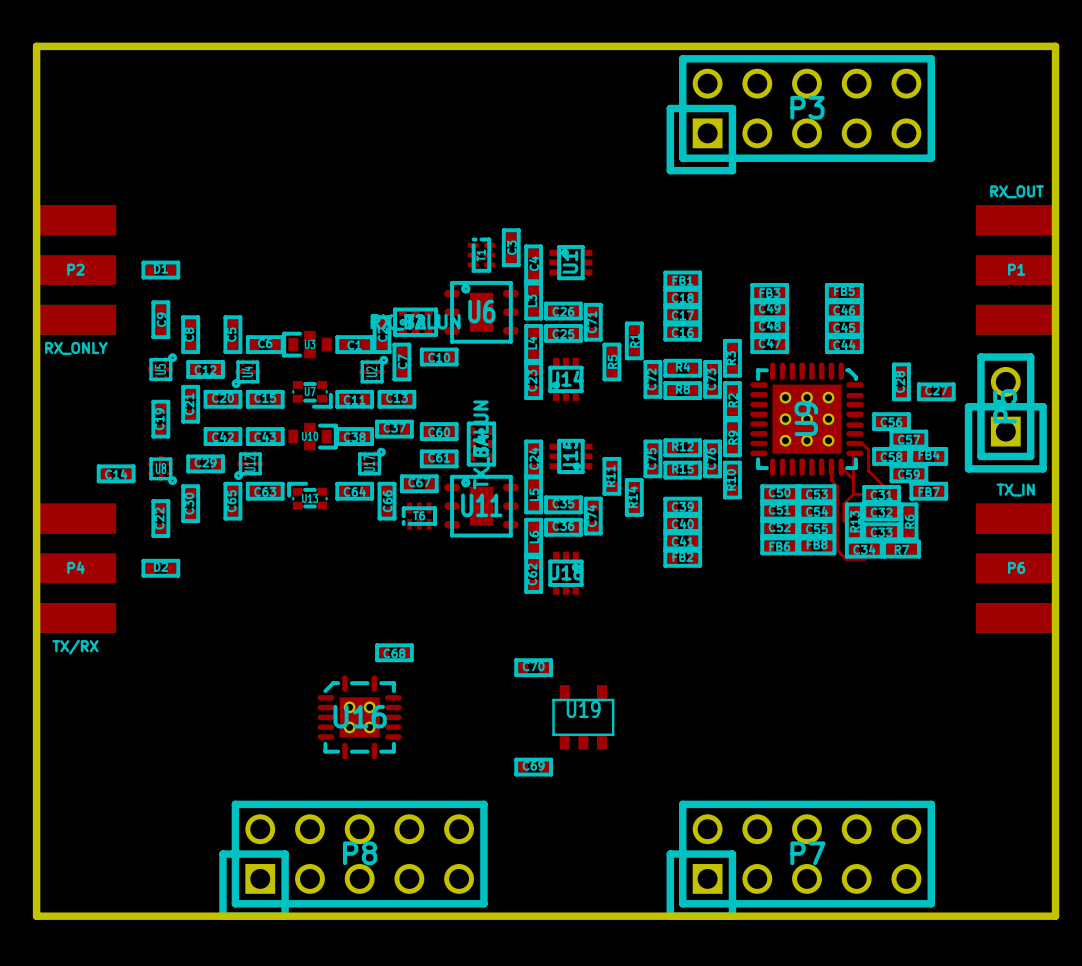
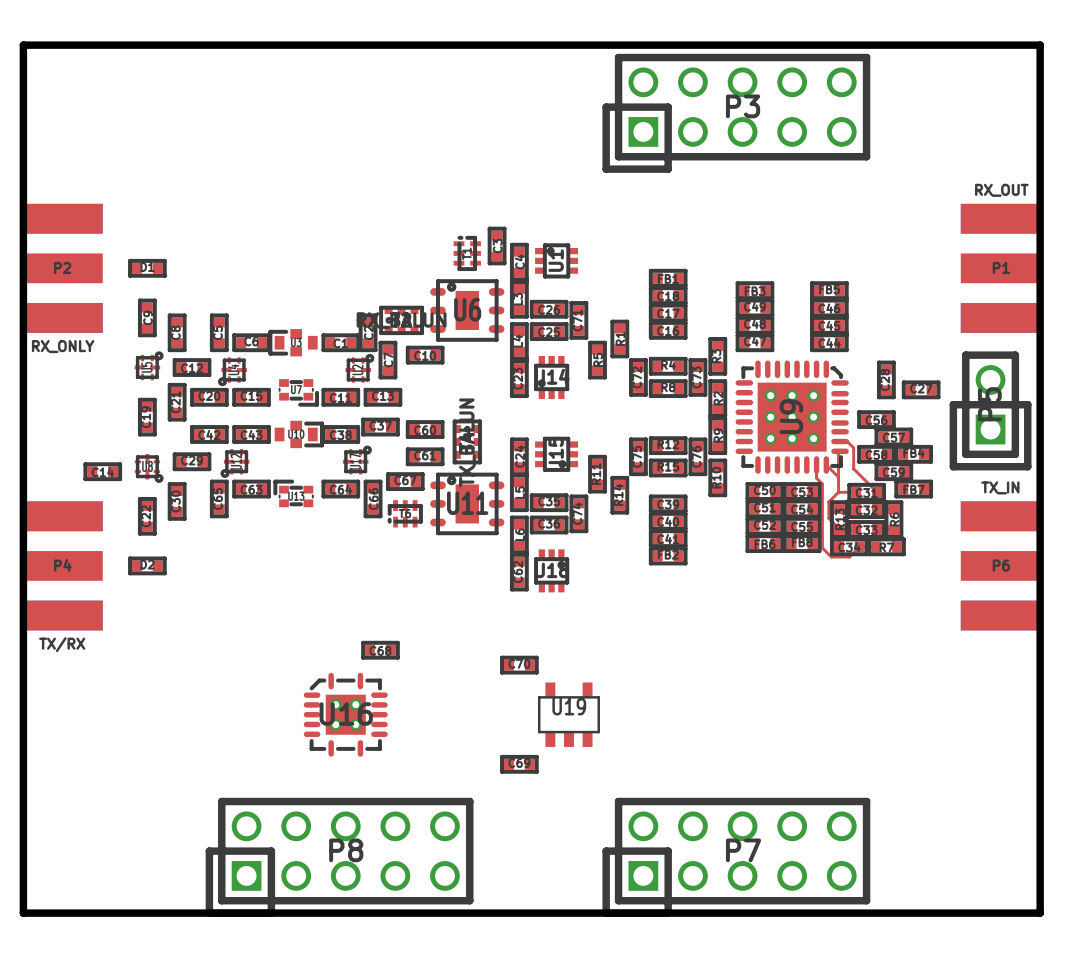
P3 position: (800, 114) -> (736, 113)
P7 position: (800, 860) -> (736, 857)

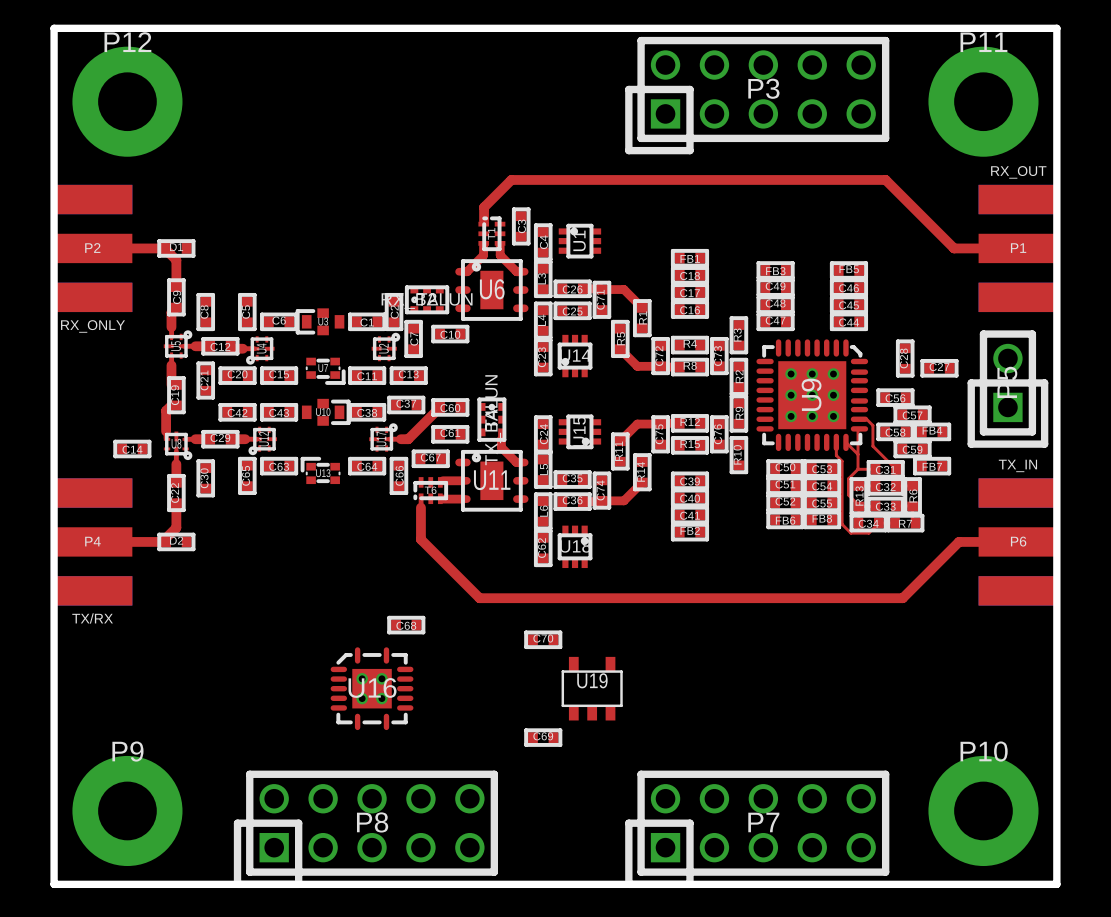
P12: none -> (127, 101)
P11: none -> (983, 101)
top track: none -> (483, 224) (484, 207) (511, 179) (885, 179) (954, 248) (1017, 248)
top track: none -> (500, 243) (500, 255) (516, 271) (520, 271)
top track: none -> (483, 246) (483, 255) (467, 271) (462, 271)
top track: none -> (93, 248) (166, 248) (176, 260) (176, 287)
top track: none -> (582, 288) (623, 289) (642, 307)
top track: none -> (176, 307) (171, 312) (171, 336)
top track: none -> (184, 346) (210, 346)
top track: none -> (230, 346) (233, 348) (254, 348)
top track: none -> (620, 349) (637, 366) (679, 367)
top track: none -> (171, 355) (171, 384)
top track: none -> (171, 405) (166, 410) (167, 439)
top track: none -> (440, 407) (408, 439) (389, 439)
top track: none -> (679, 423) (637, 424) (620, 441)
top track: none -> (501, 432) (501, 447) (516, 462) (520, 462)
top track: none -> (185, 439) (210, 439)
top track: none -> (230, 439) (256, 439)
top track: none -> (176, 451) (176, 482)
top track: none -> (462, 480) (440, 482)
top track: none -> (642, 482) (623, 500) (582, 501)
top track: none -> (440, 498) (462, 499)
top track: none -> (176, 503) (176, 527) (166, 538) (166, 541) (93, 541)
top track: none -> (420, 507) (420, 539) (479, 598) (902, 598) (959, 541) (1017, 541)
P9: none -> (127, 810)
P10: none -> (983, 810)

